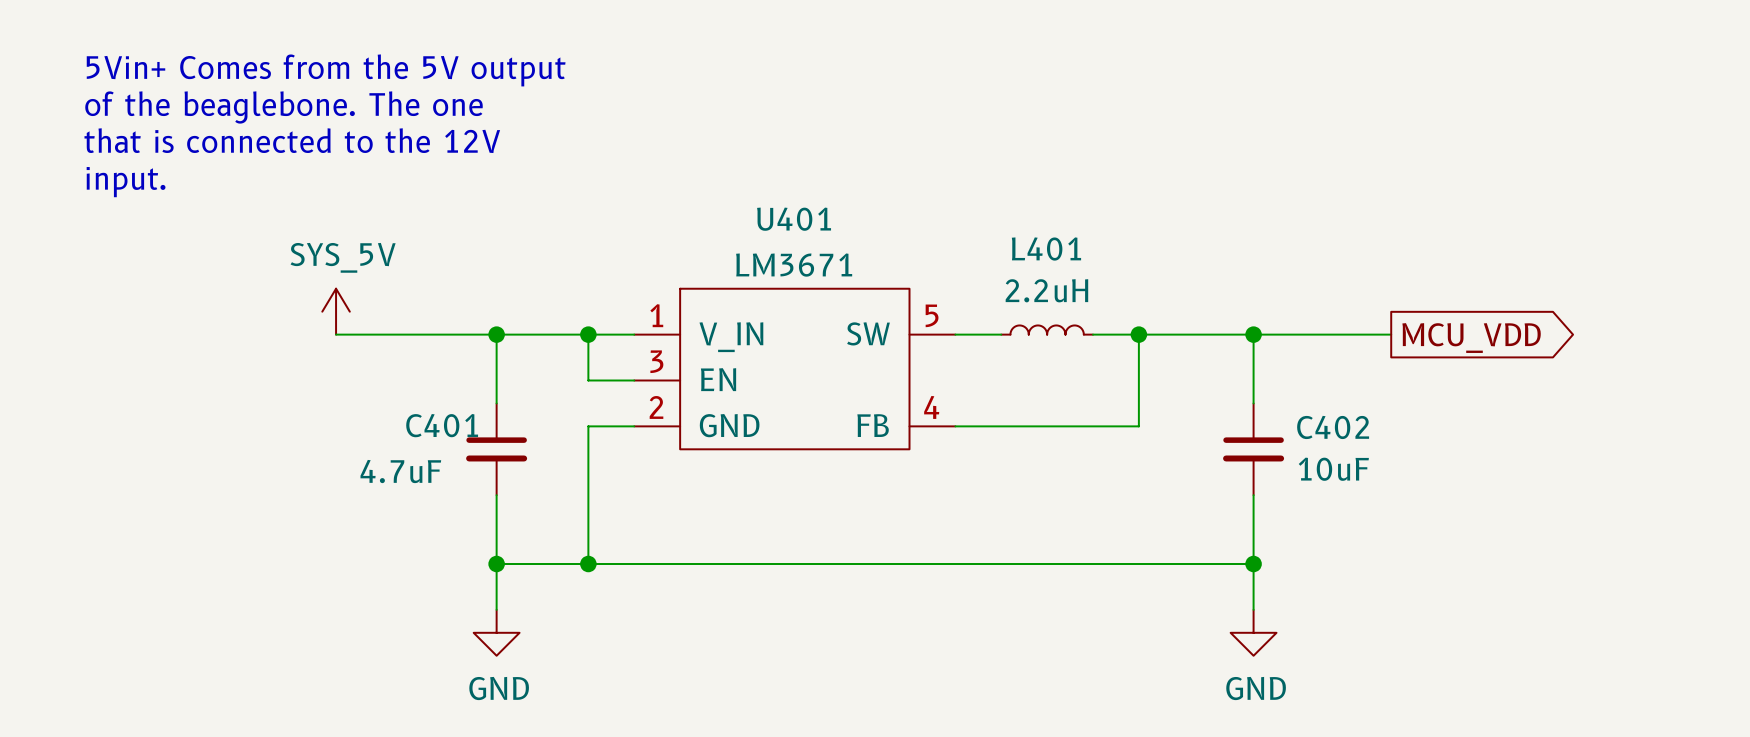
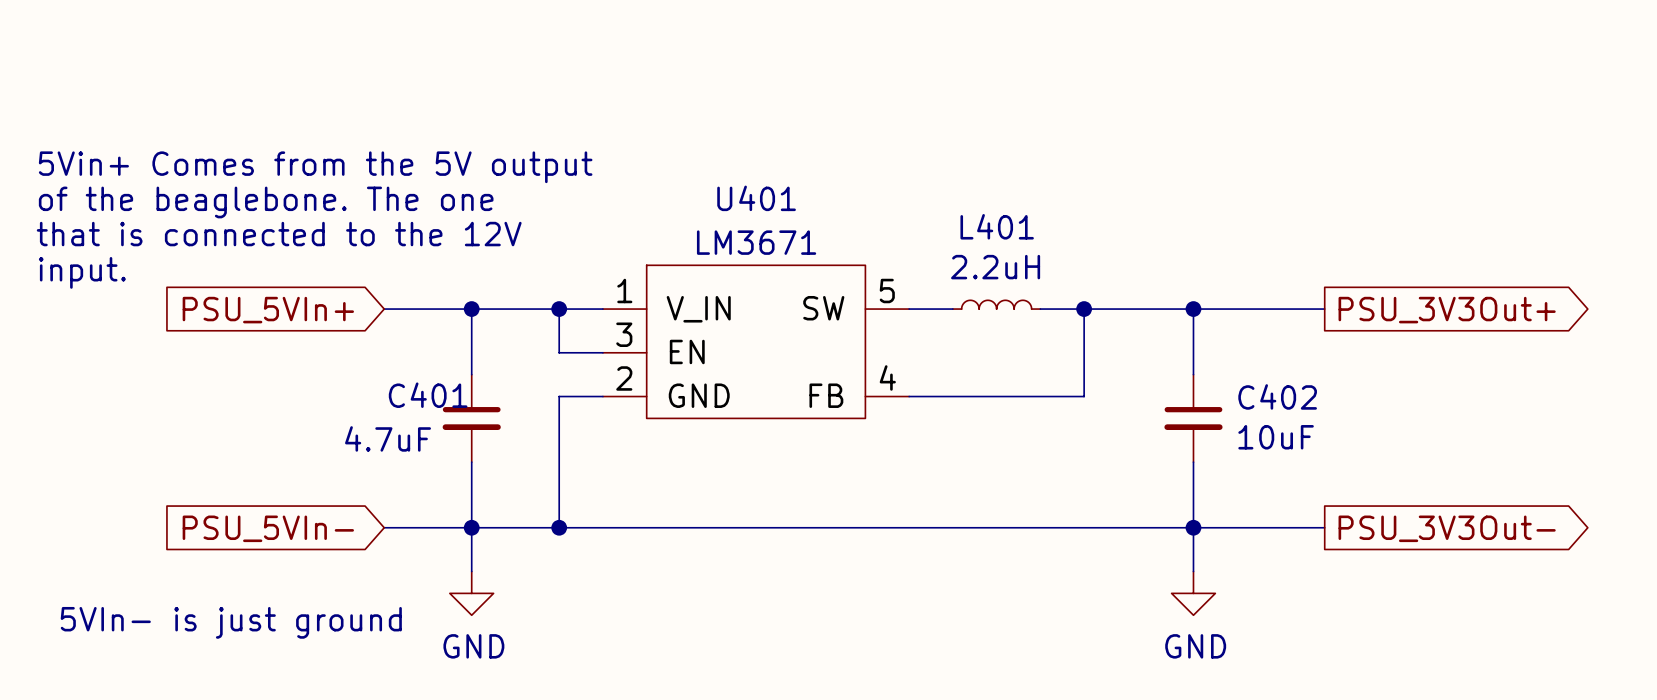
text position: 5Vin+ Comes from the 5V output (326, 70) -> 5Vin+ Comes from the 5V output (315, 167)
text position: of the beaglebone. The one (283, 107) -> of the beaglebone. The one (266, 202)
text position: that is connected to the 12V (292, 140) -> that is connected to the 12V (279, 234)
text position: input. (126, 182) -> input. (82, 272)
power symbol: SYS_5V (336, 311) -> none
wire: (336, 334) (404, 334) -> none
global label: none -> PSU_5VIn+ (268, 310)
global label: MCU_VDD (1471, 338) -> PSU_3V3Out+ (1447, 310)
wire: none -> (384, 527) (471, 527)
wire: none -> (1193, 527) (1324, 527)
global label: none -> PSU_5VIn- (268, 528)
global label: none -> PSU_3V3Out- (1447, 528)
text: none -> 5VIn- is just ground (231, 622)

